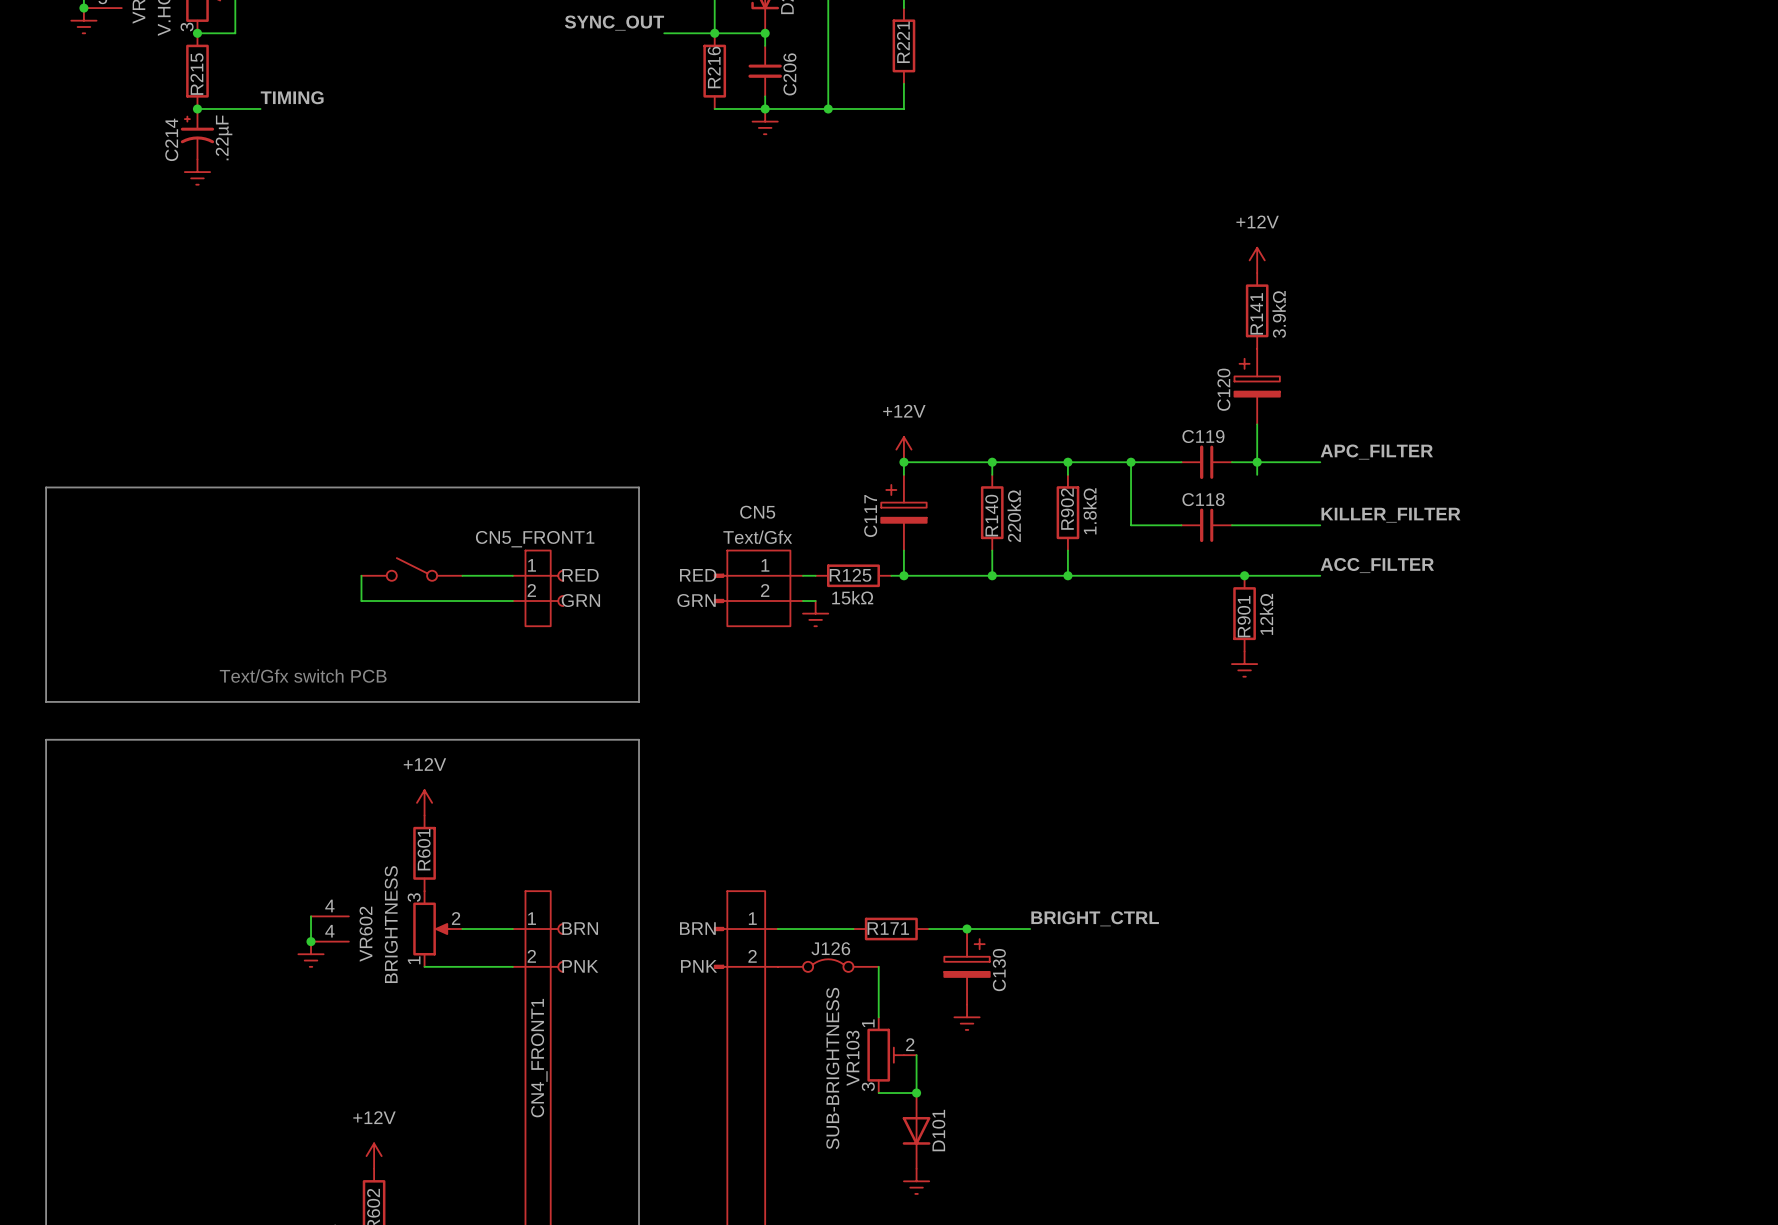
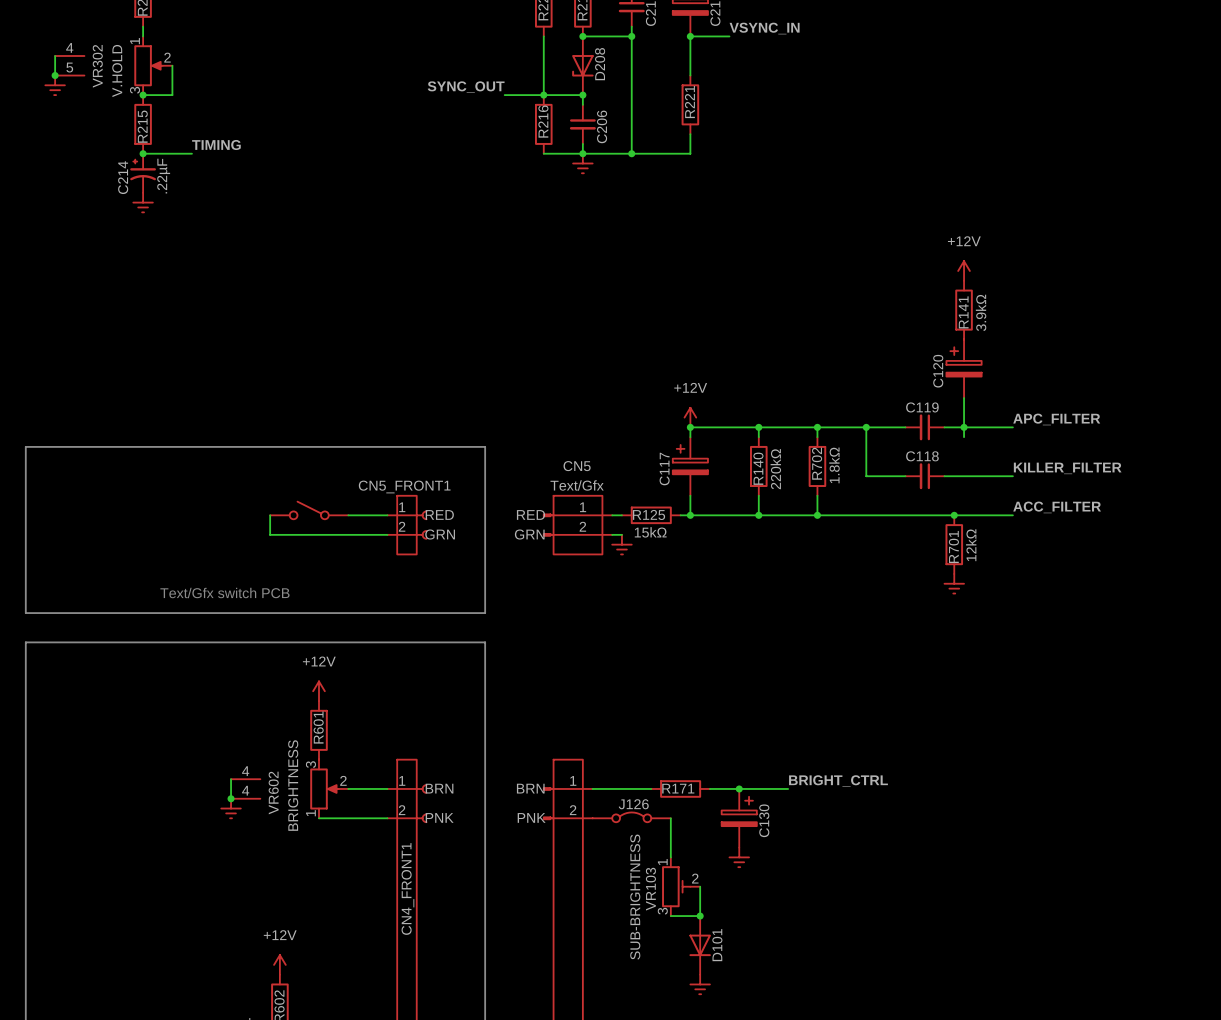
R902 name: R902 (1067, 509) -> R702 (817, 463)
R901 name: R901 (1244, 616) -> R701 (953, 546)

